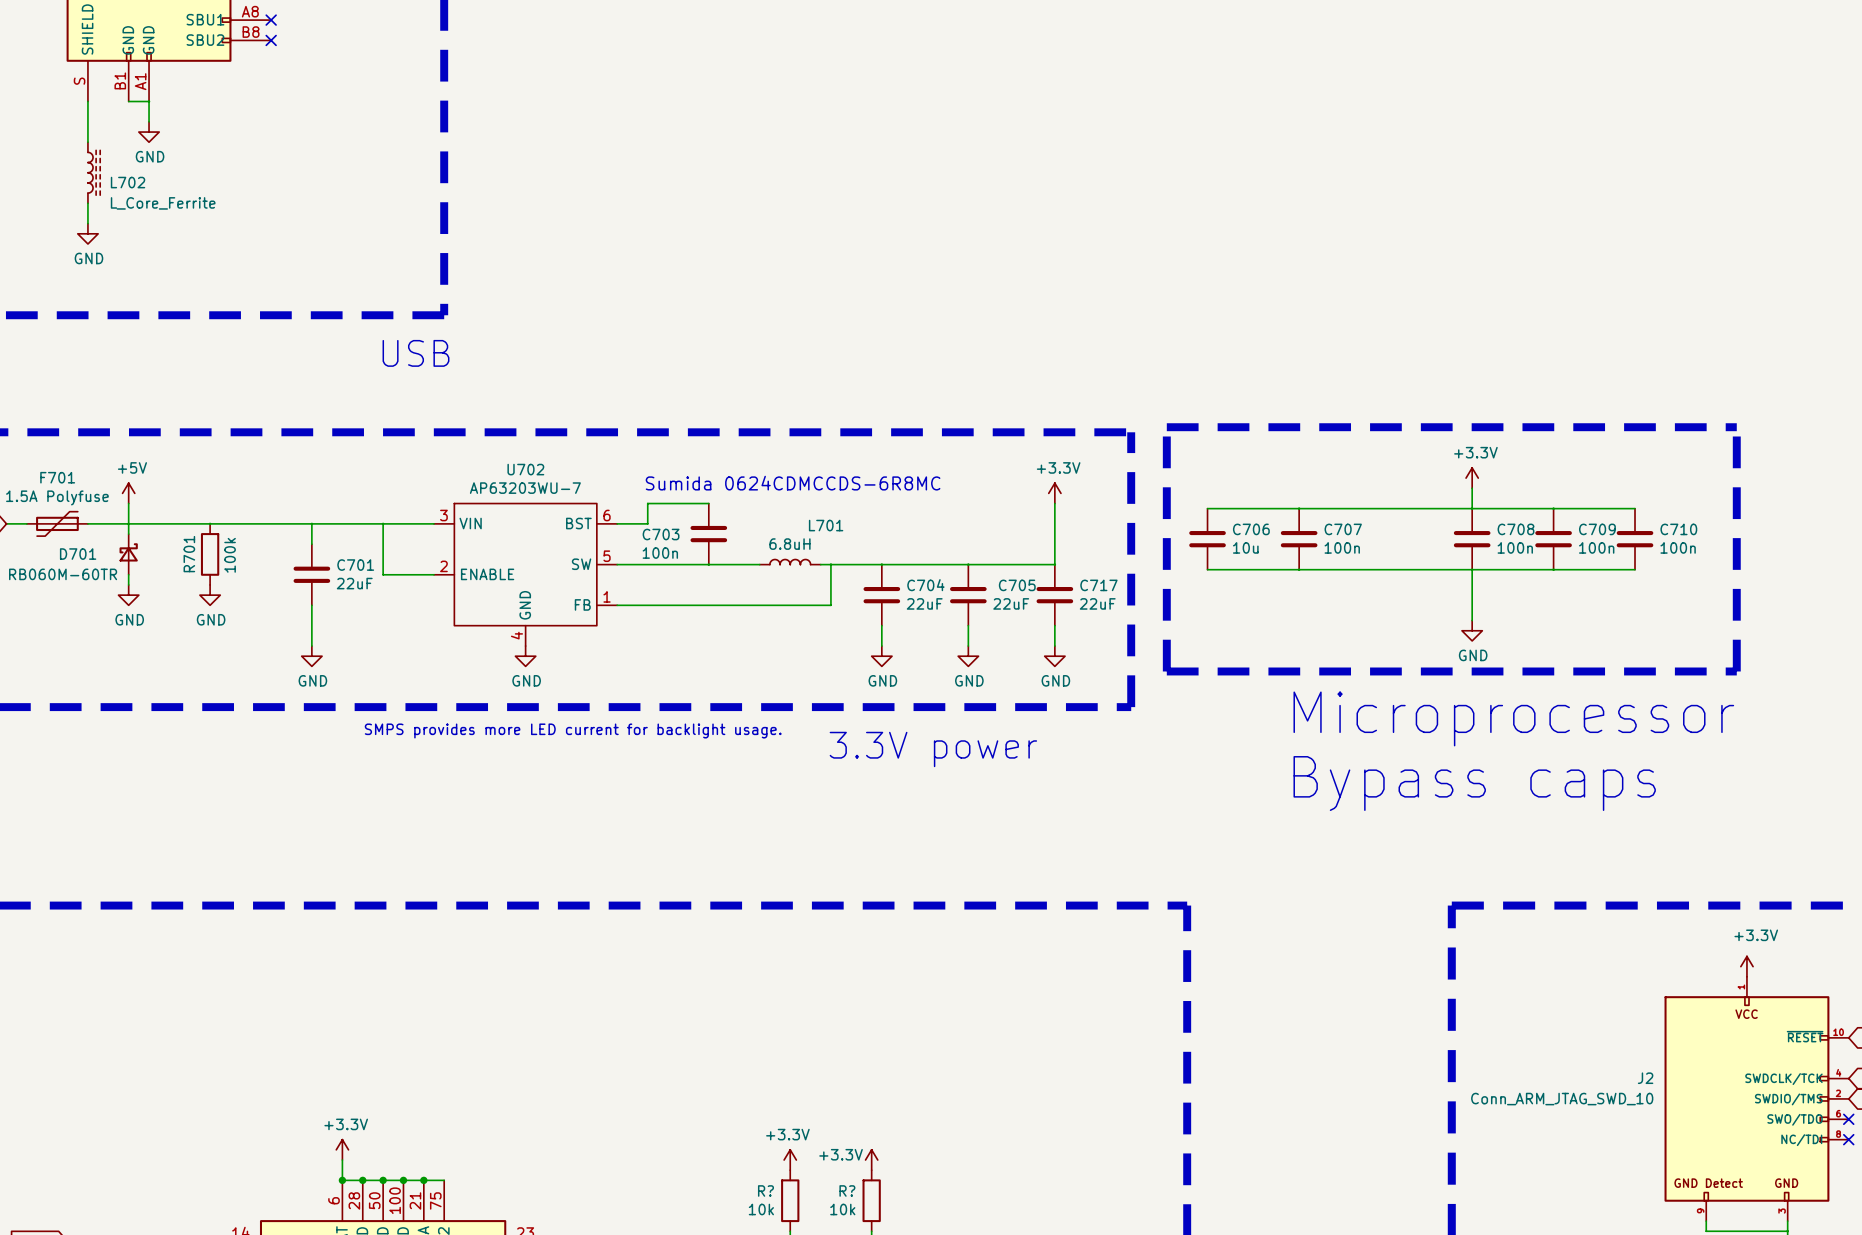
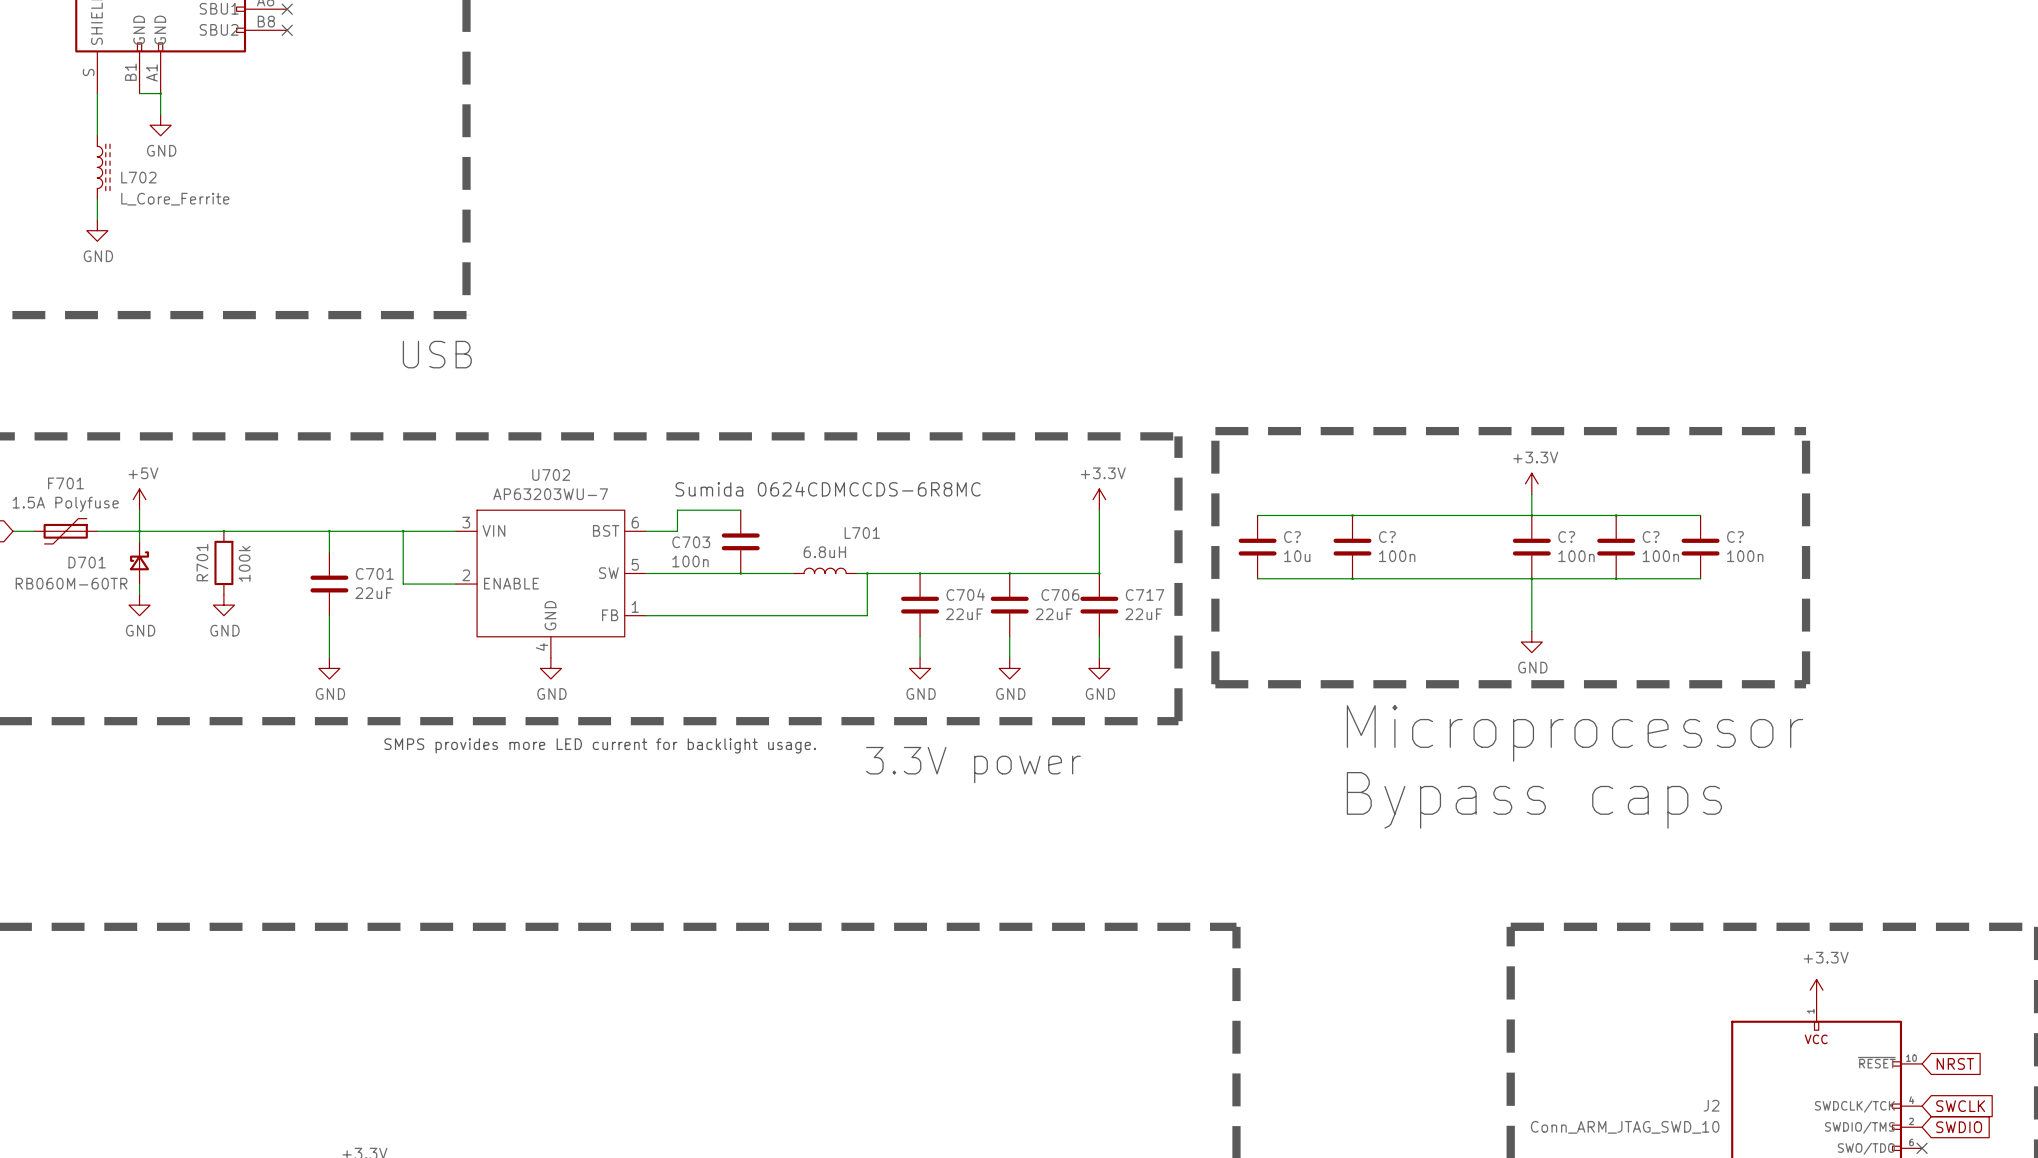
C706 name: C706 (1251, 529) -> C? (1292, 537)
C707 name: C707 (1343, 529) -> C? (1387, 537)
C708 name: C708 (1516, 529) -> C? (1566, 537)
C709 name: C709 (1597, 529) -> C? (1651, 537)
C710 name: C710 (1678, 529) -> C? (1735, 537)
C705 name: C705 (1017, 585) -> C706 (1060, 595)

